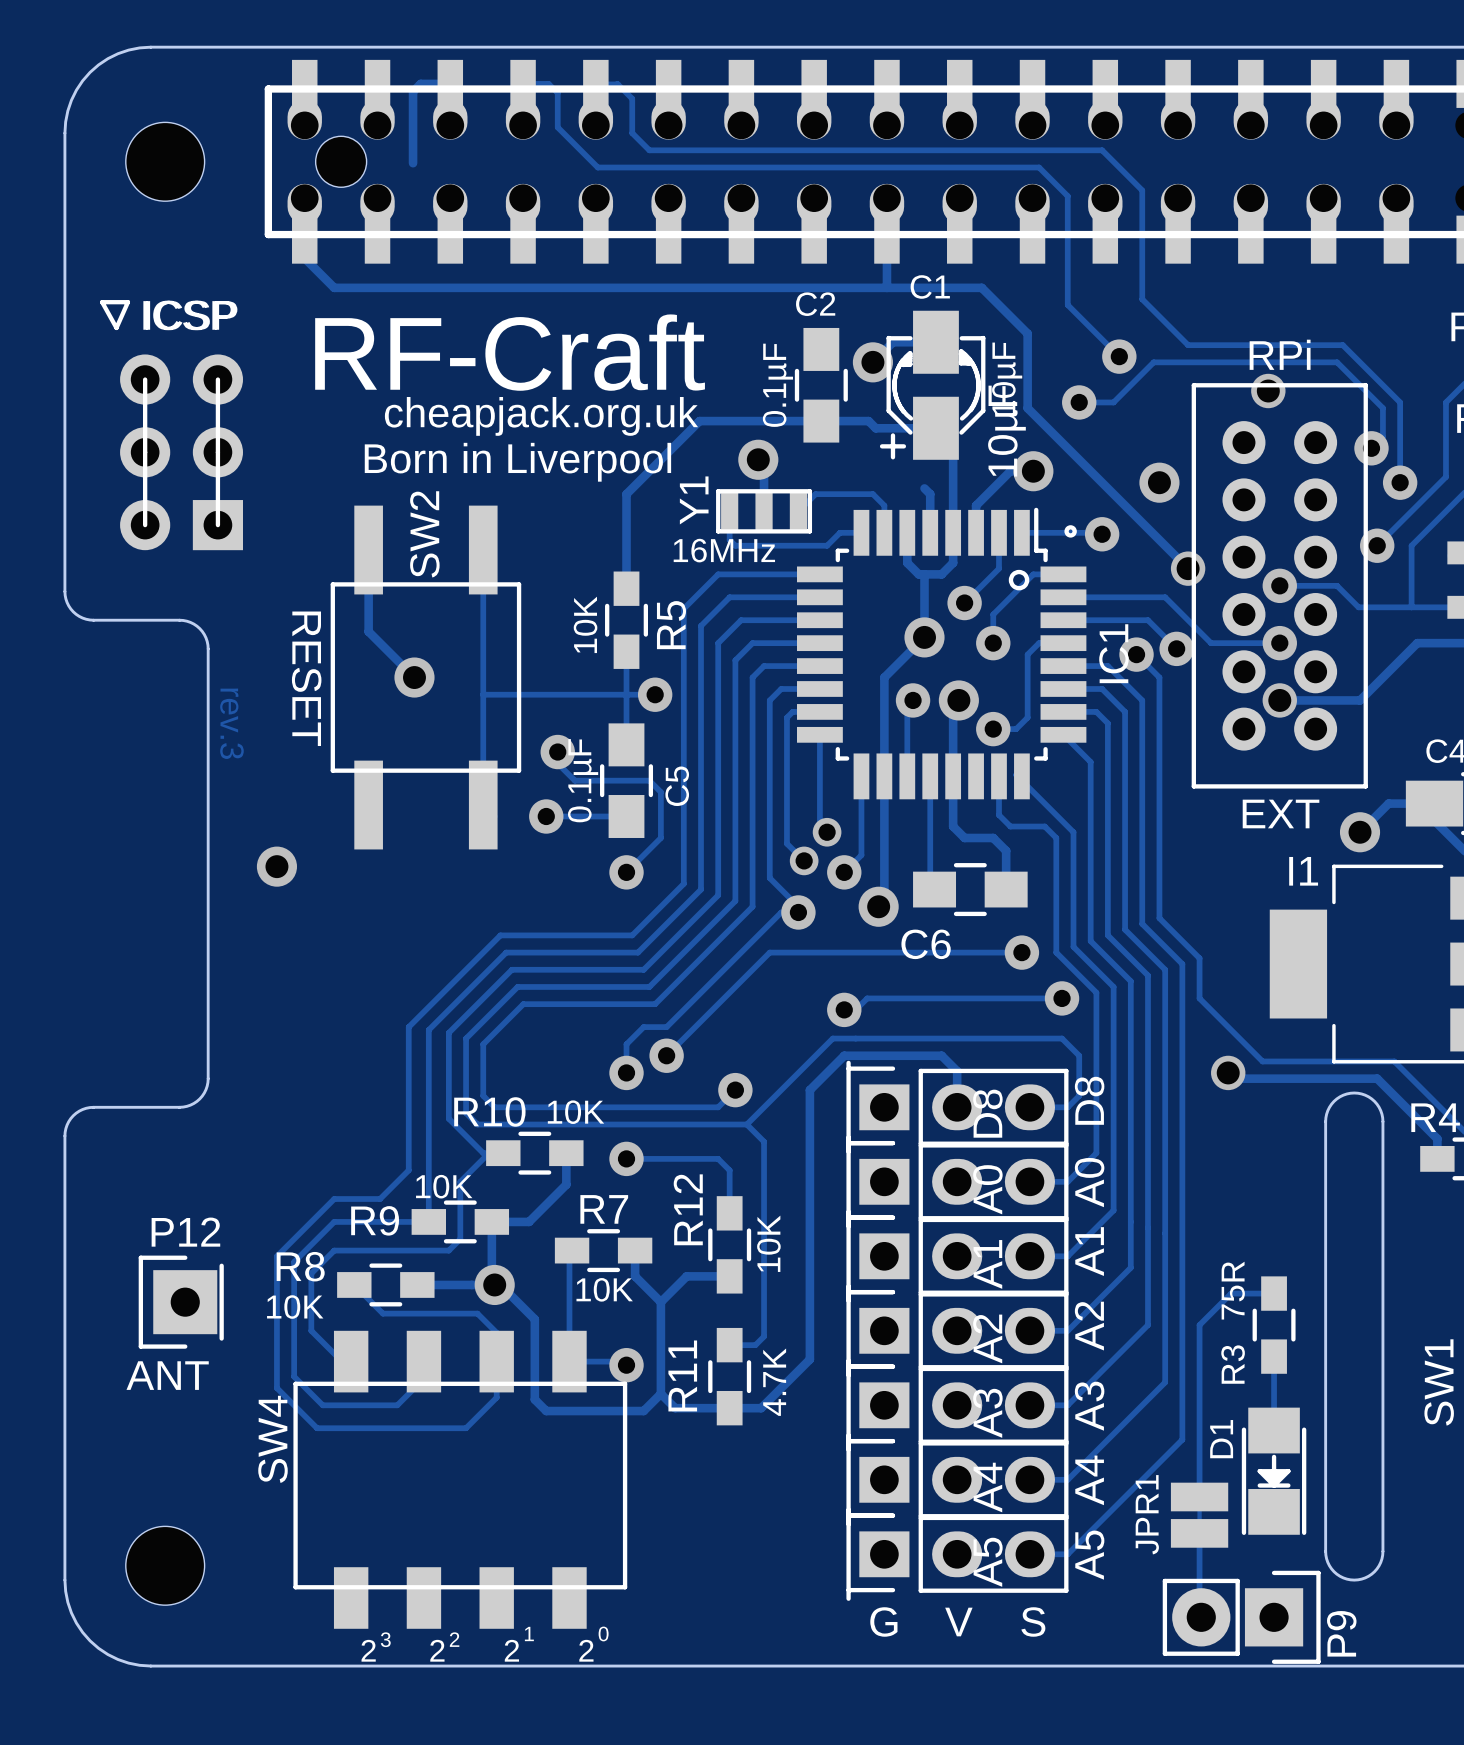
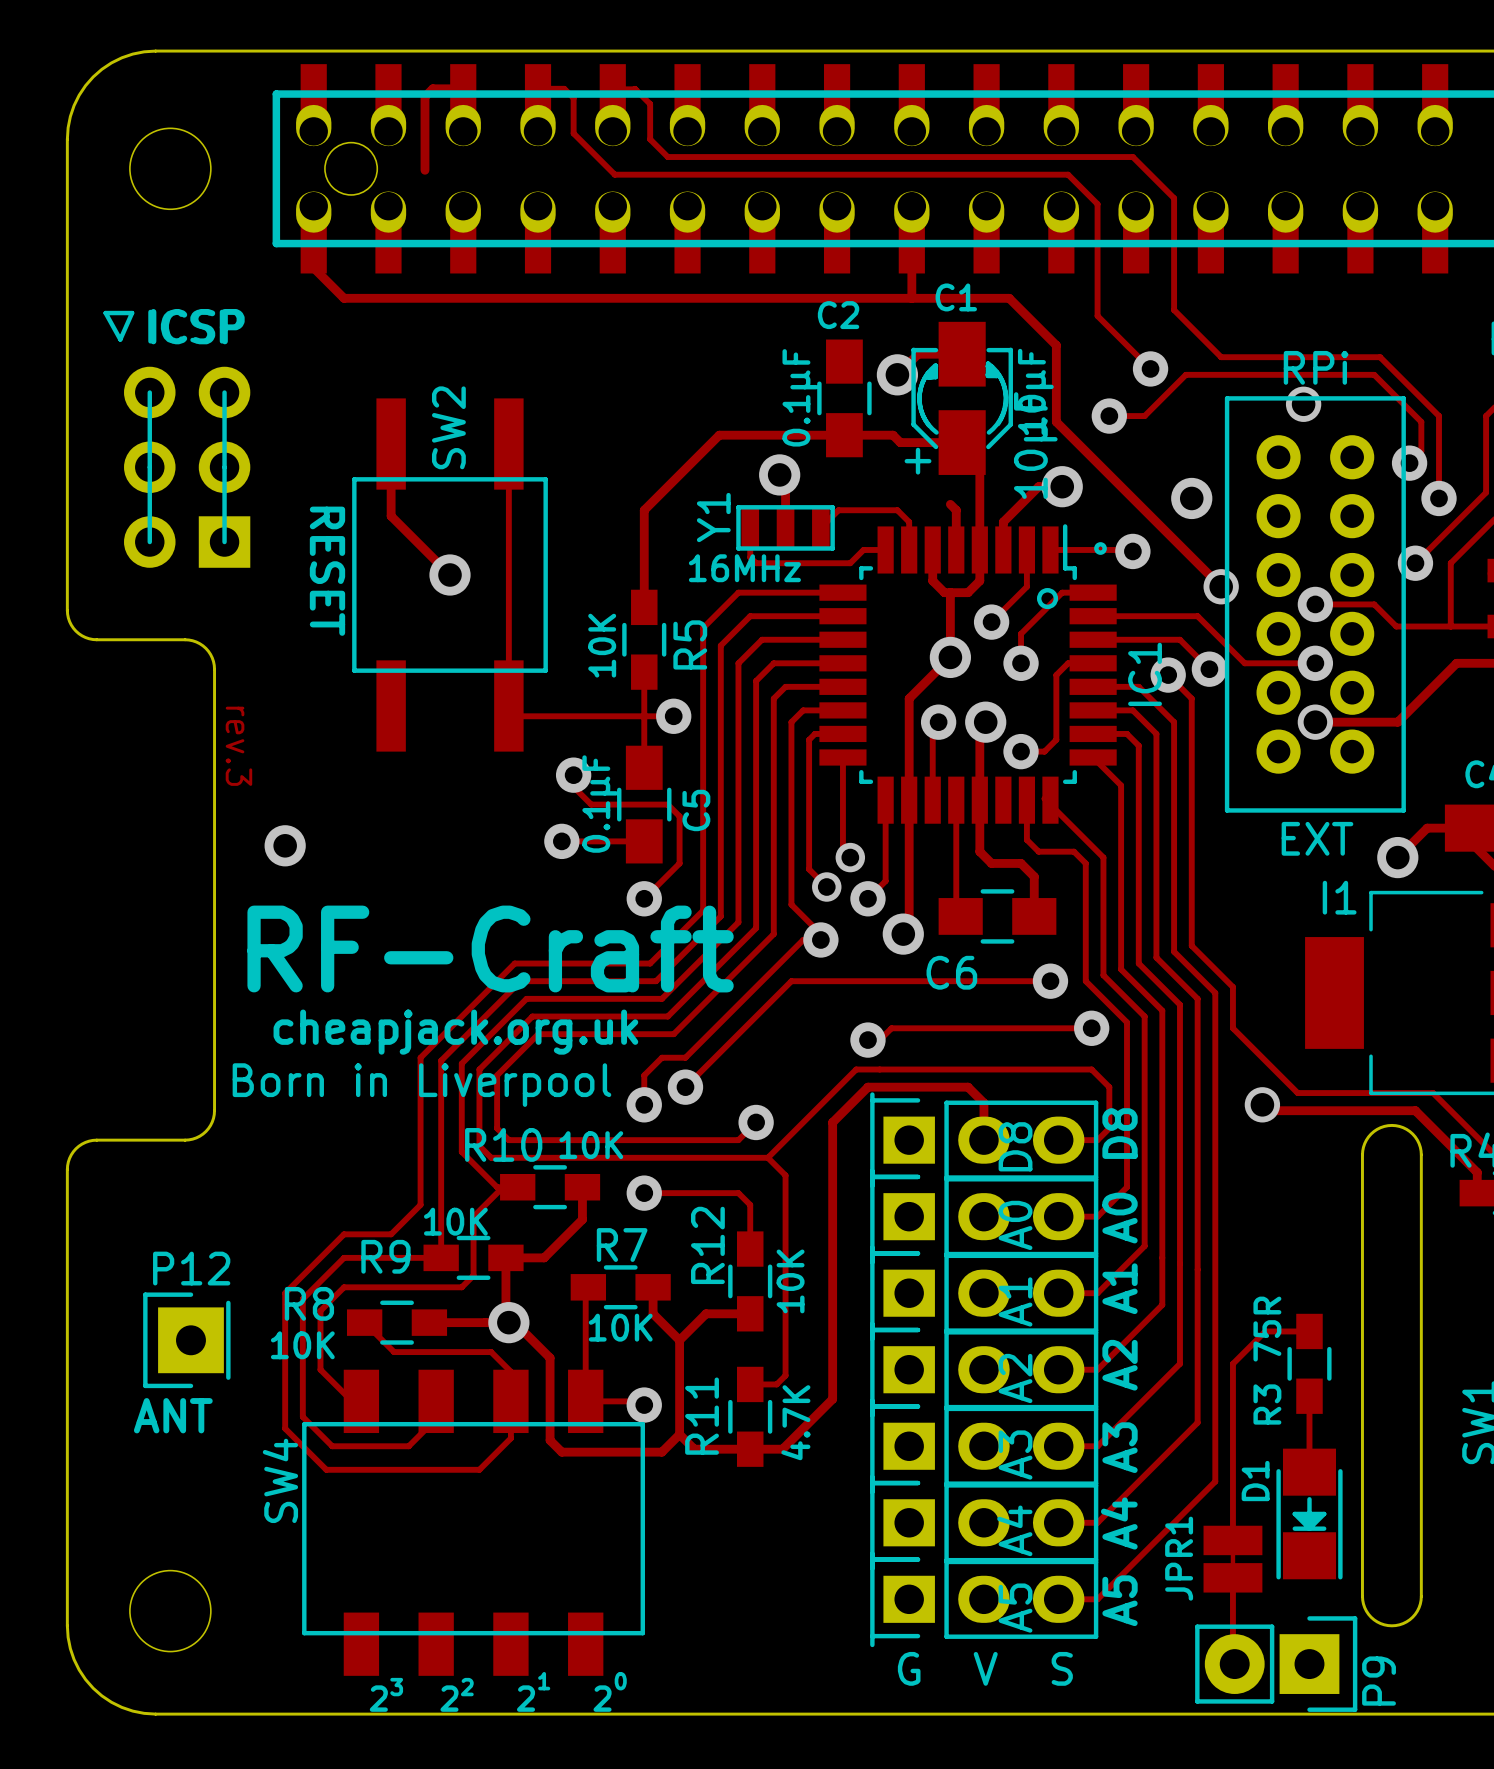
text position: RF-Craft (510, 352) -> RF-Craft (490, 949)
text position: cheapjack.org.uk (541, 416) -> cheapjack.org.uk (455, 1032)
track: none -> (391, 444) (391, 516) (450, 575)
text position: Born in Liverpool (517, 462) -> Born in Liverpool (421, 1085)
track: (368, 550) (368, 631) (414, 677) -> none
track: (483, 550) (483, 805) (494, 816) -> none
via: none -> (450, 575)
via: (414, 677) -> none
SW2 position: (425, 677) -> (450, 575)
text position: RESET (306, 678) -> RESET (327, 571)
track: (483, 694) (504, 694) -> (508, 444) (508, 705) (519, 716)
via position: (276, 866) -> (285, 845)

